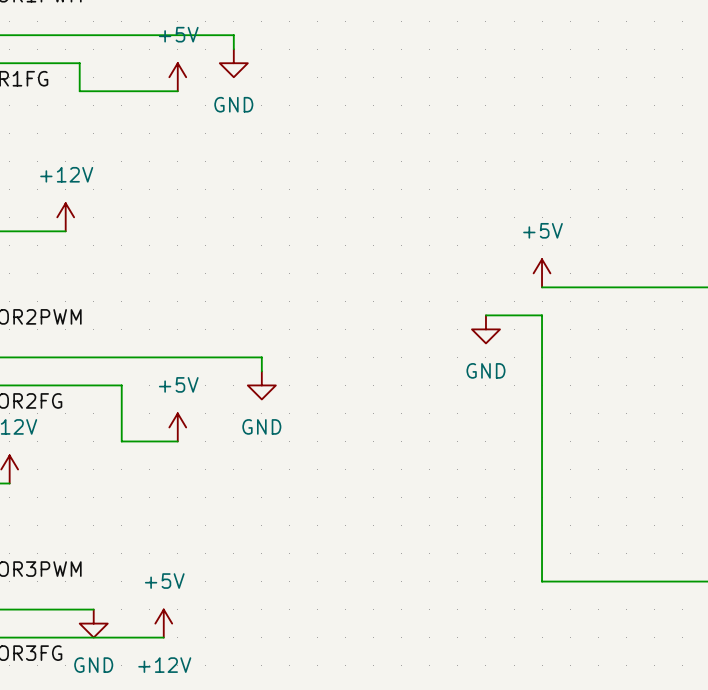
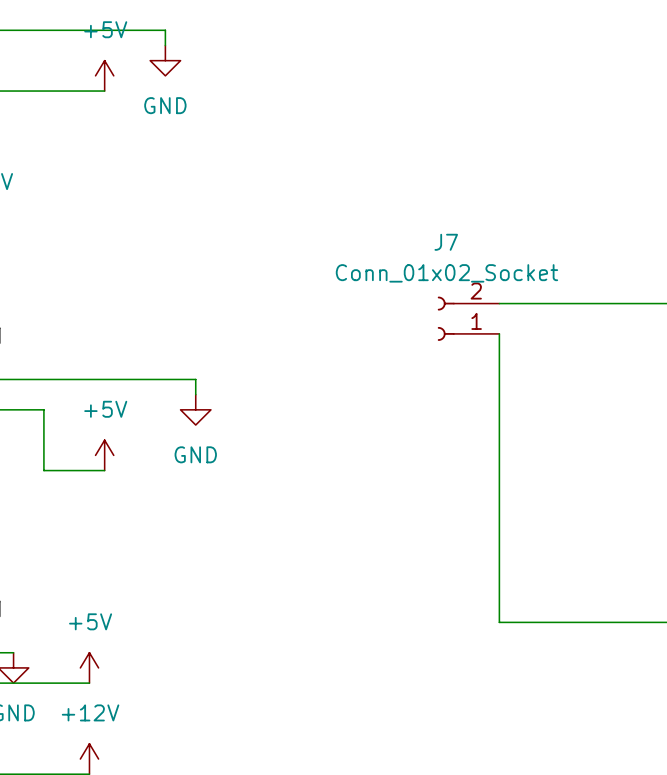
power symbol: +5V (542, 273) -> none
J7: none -> Conn_01x02_Socket (468, 318)
power symbol: GND (485, 329) -> none

